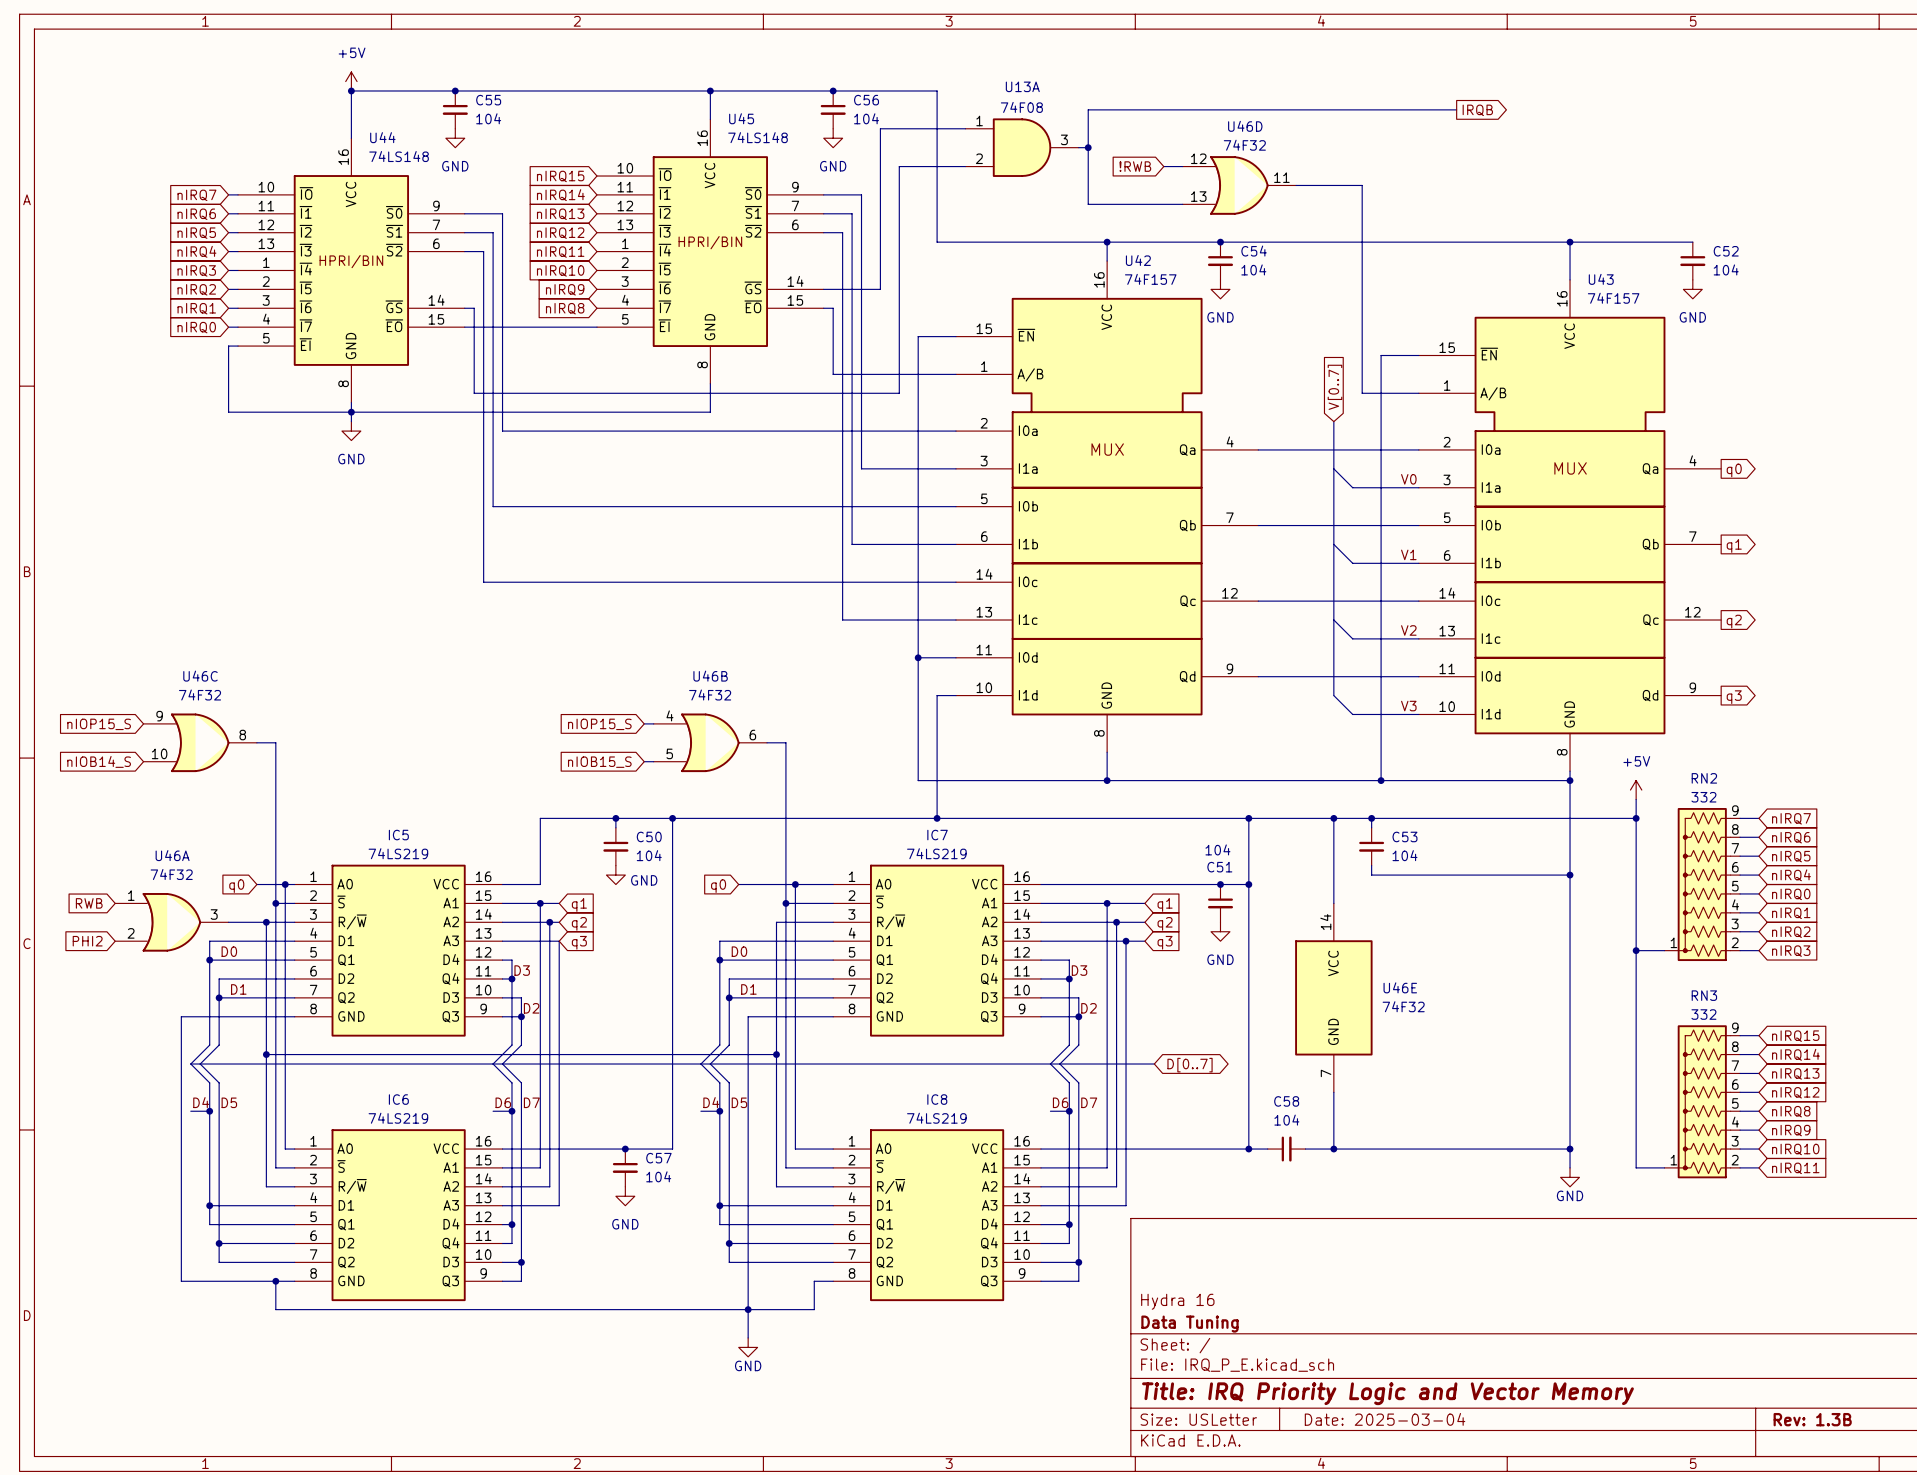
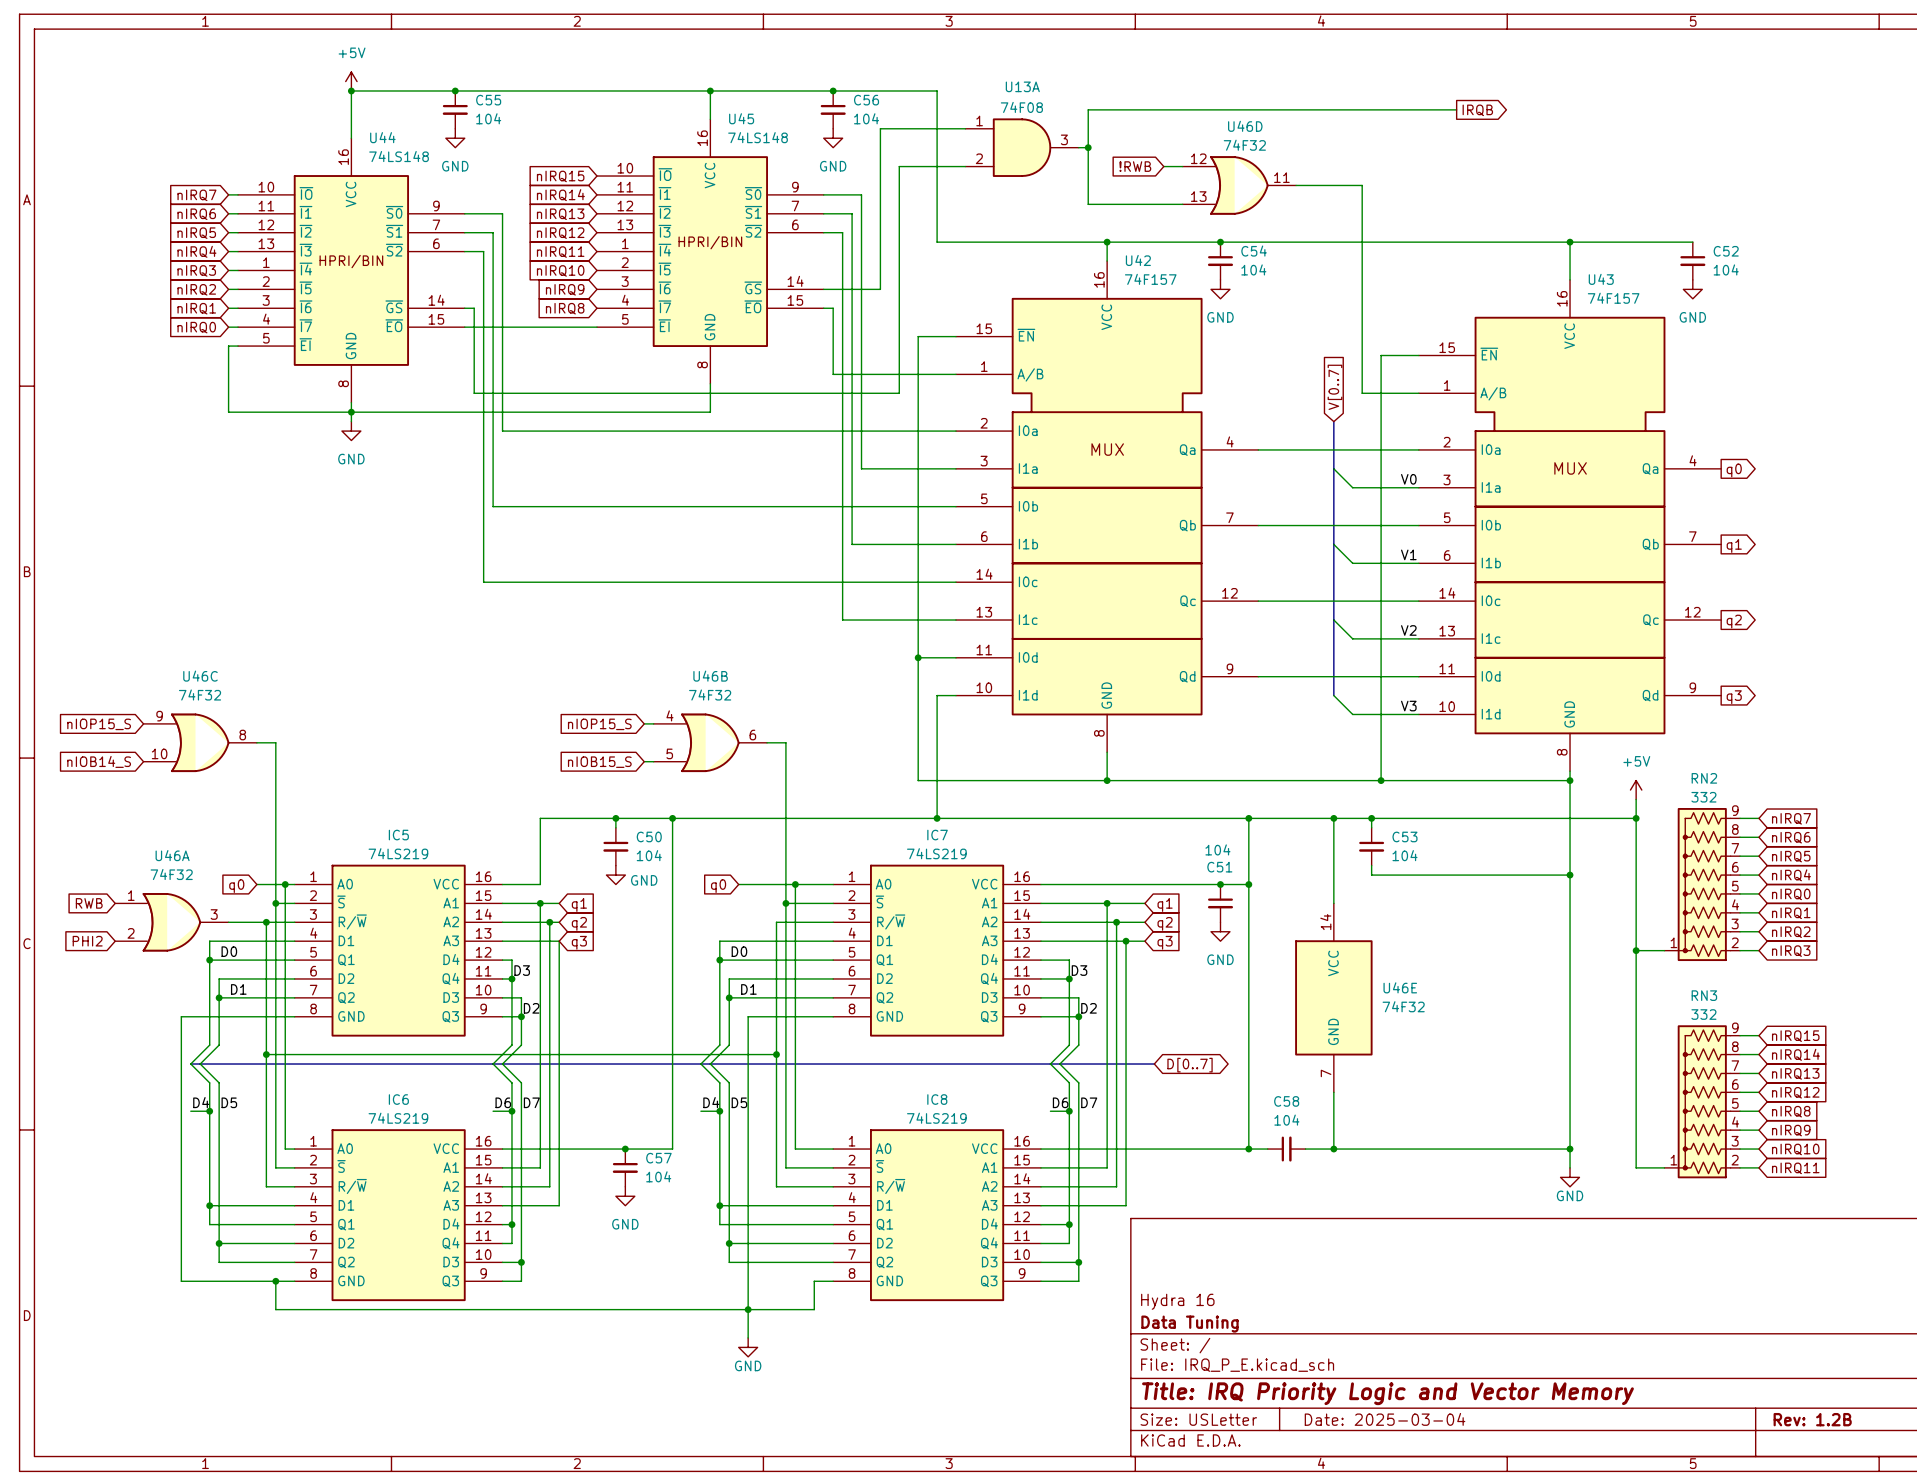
title block: Rev: 1.3B (1812, 1419) -> Rev: 1.2B (1812, 1419)

